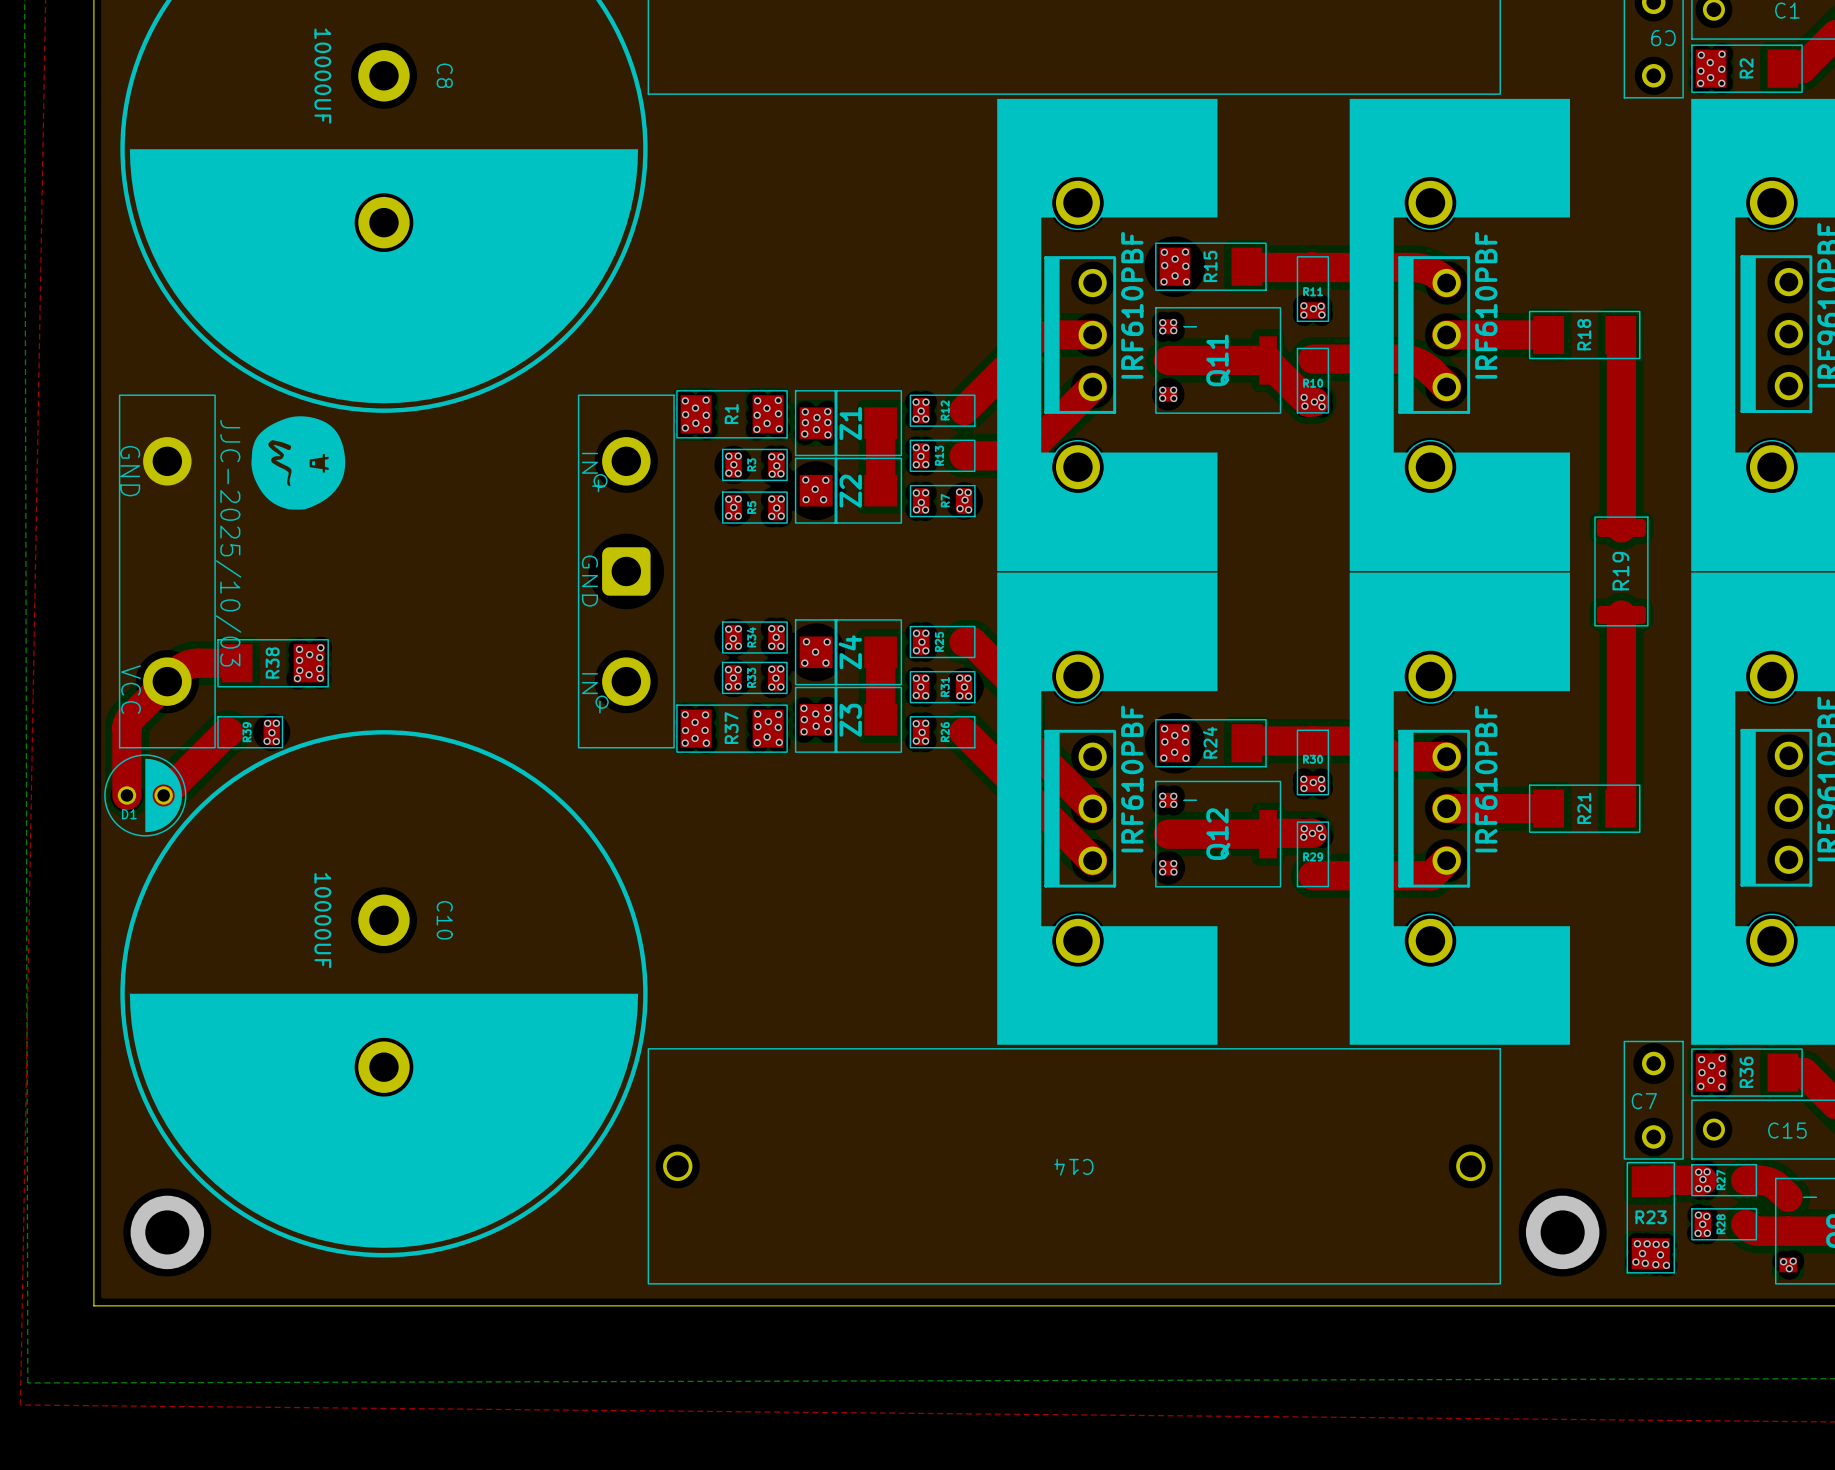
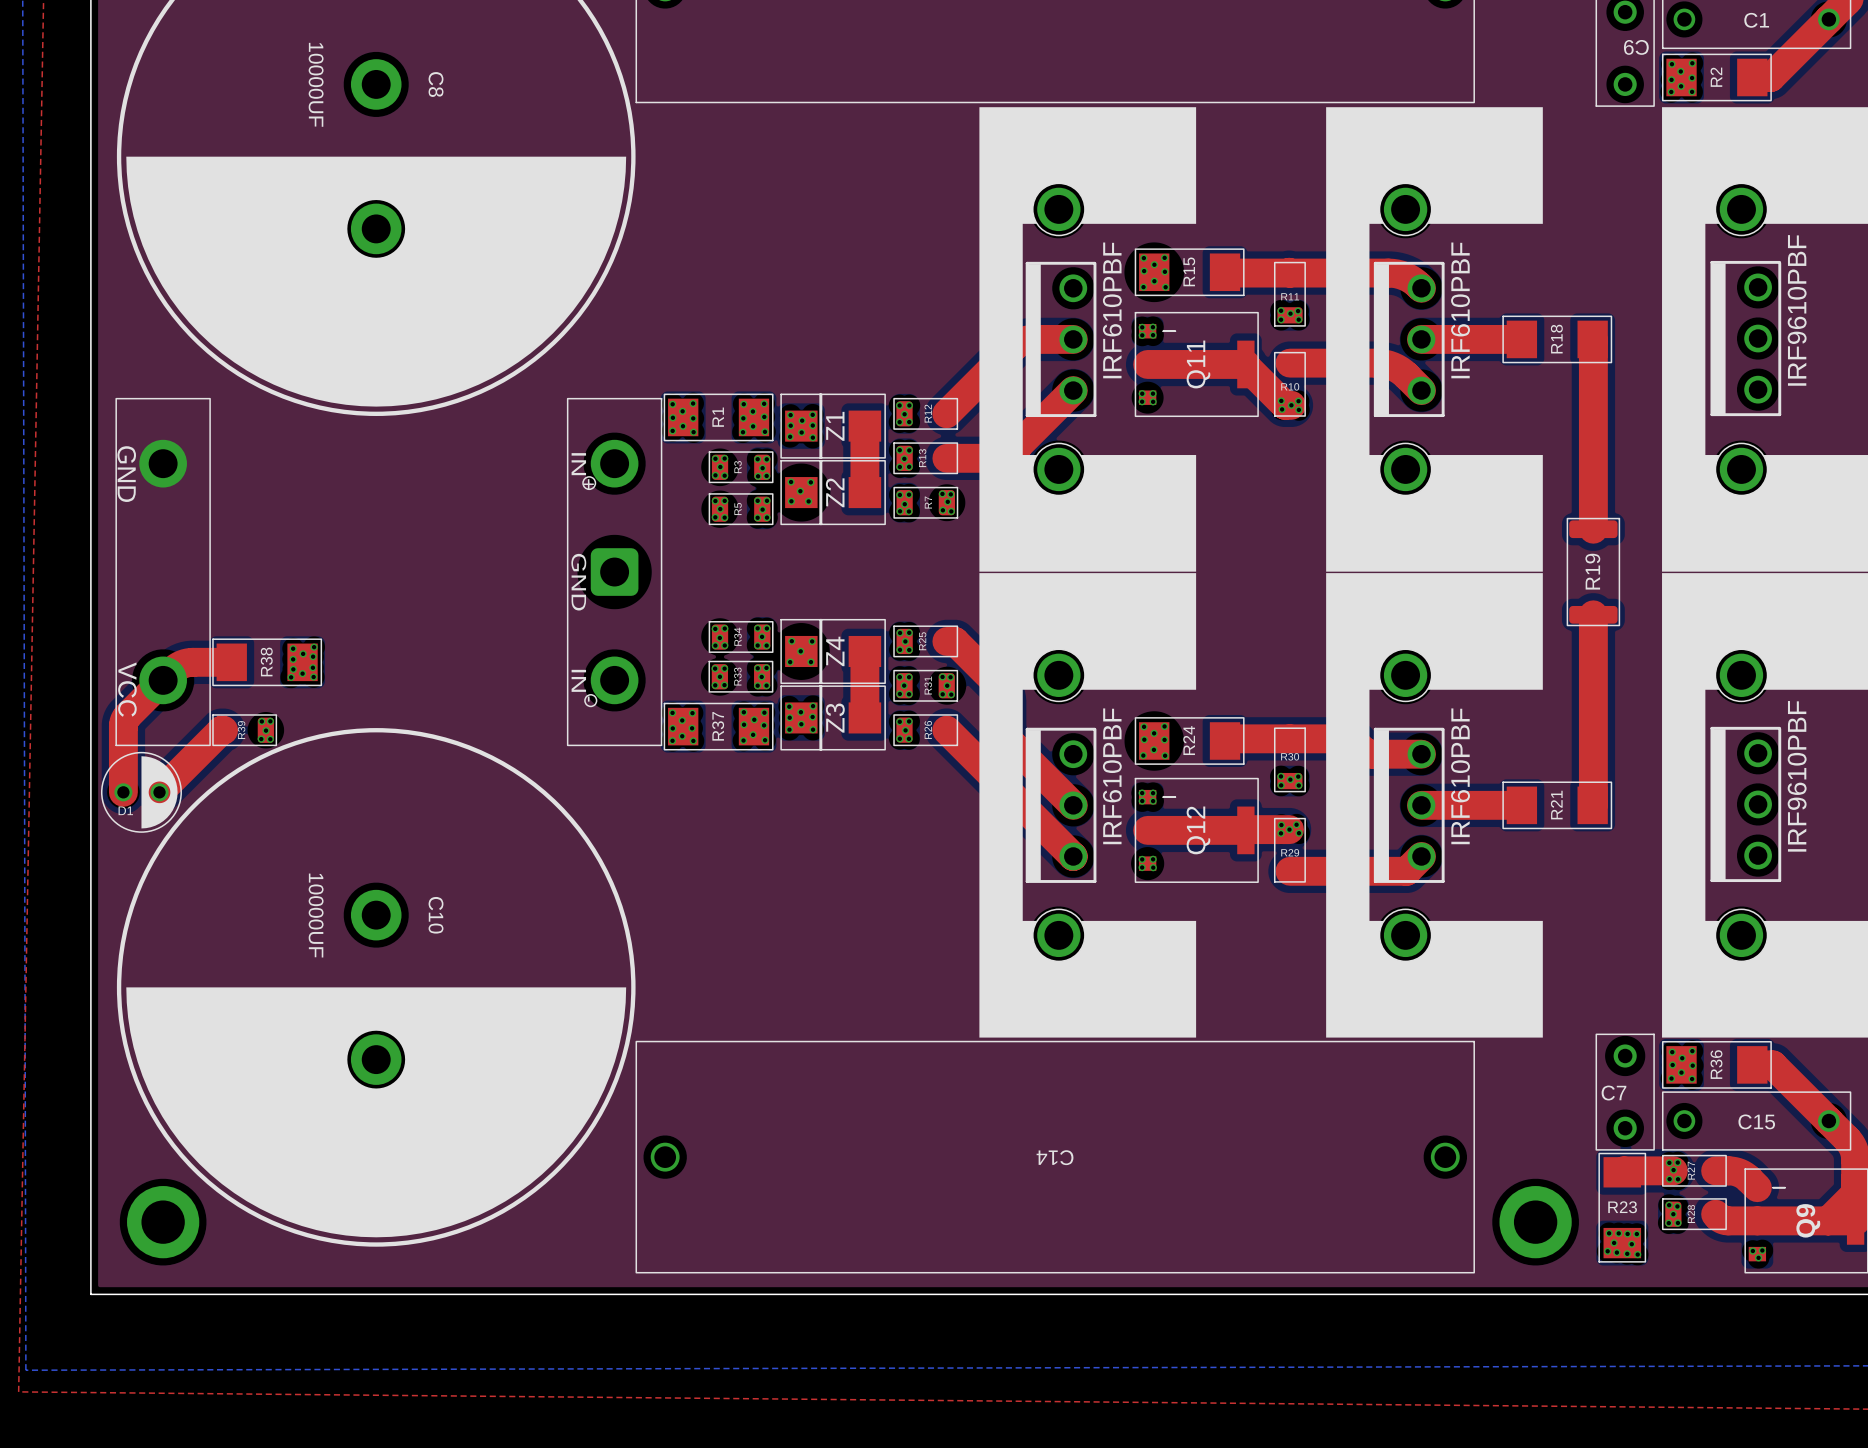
drawing: [251, 416, 346, 510] -> none

